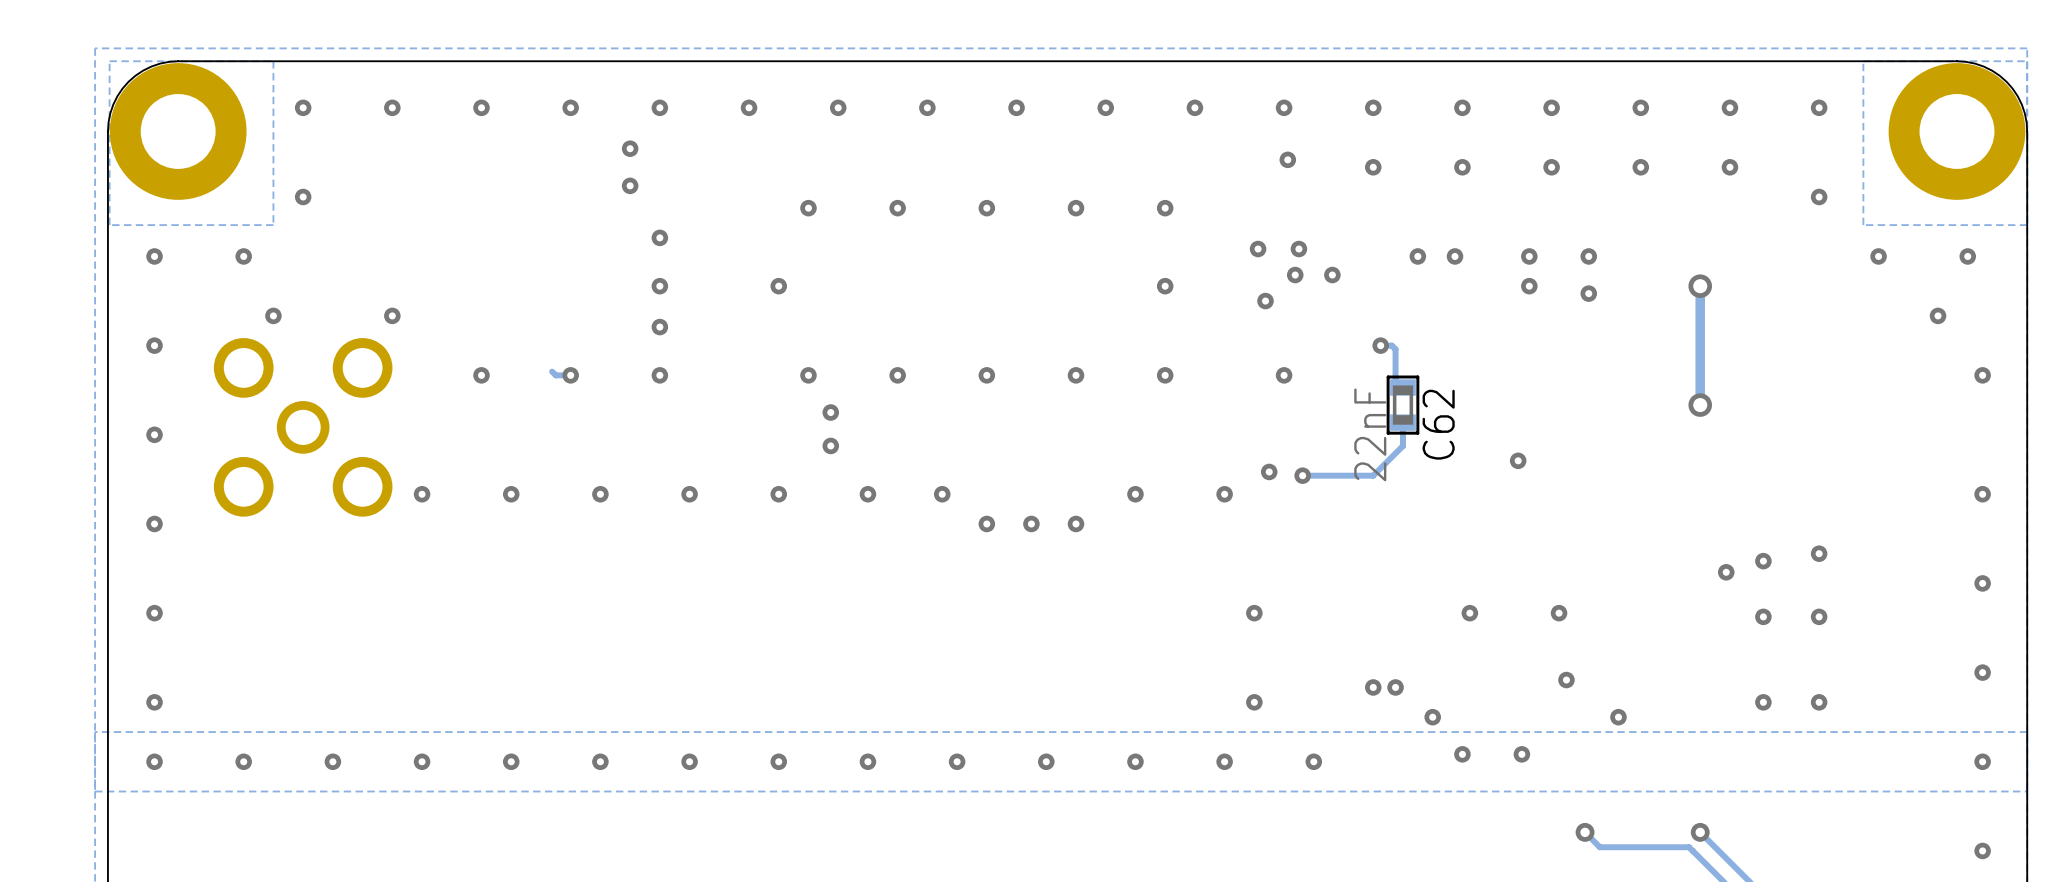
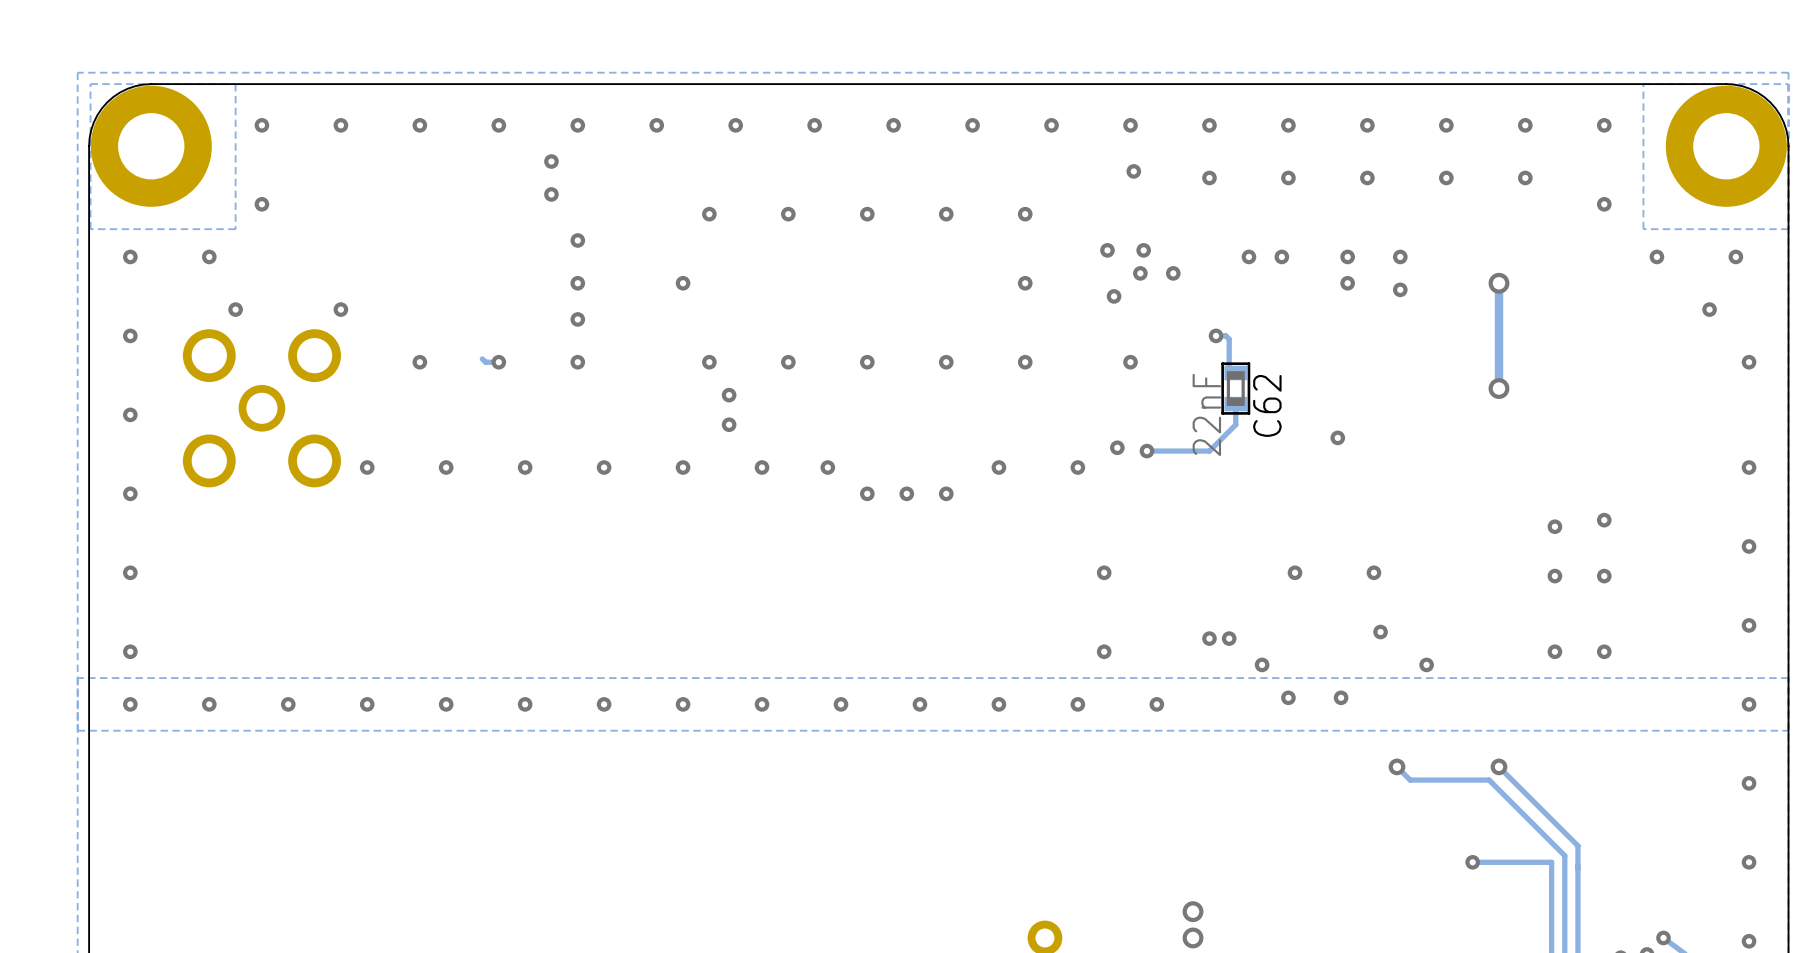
via: (1726, 572) -> none

